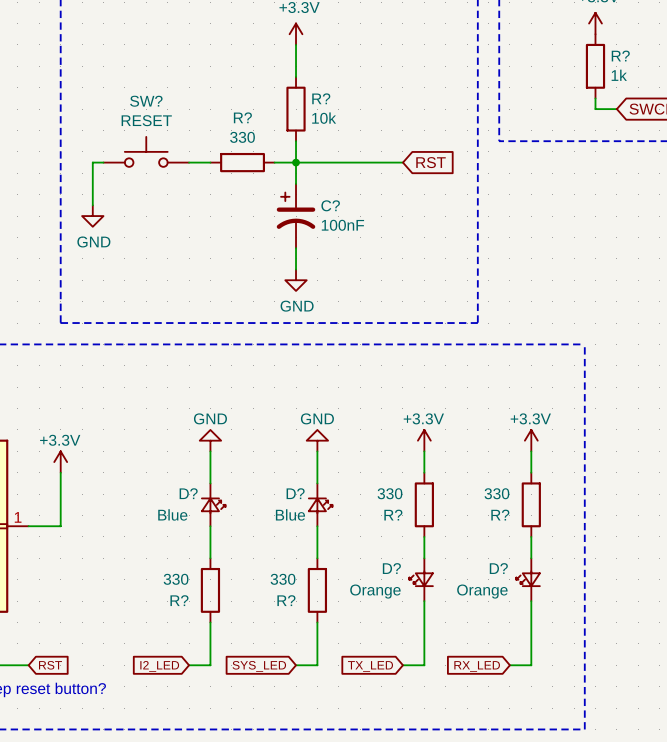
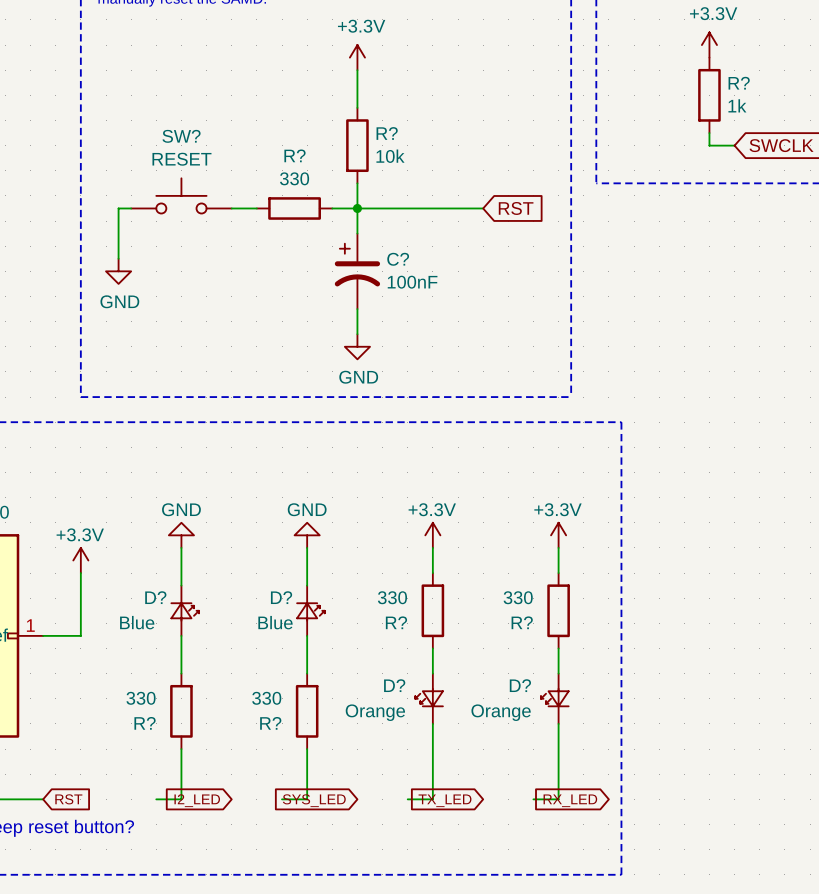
line: (520, 344) (584, 344) (584, 729) (520, 729) -> (621, 422) (621, 874)
power symbol: none -> GND (181, 535)
power symbol: GND (210, 440) -> none
power symbol: none -> GND (307, 535)
power symbol: GND (317, 440) -> none
power symbol: none -> +3.3V (432, 535)
power symbol: +3.3V (424, 440) -> none
power symbol: none -> +3.3V (558, 535)
power symbol: +3.3V (531, 440) -> none
wire: (210, 451) (210, 483) -> (181, 547) (181, 585)
wire: (317, 451) (317, 483) -> (307, 547) (307, 585)
wire: (424, 451) (424, 472) -> (432, 547) (432, 573)
wire: (531, 451) (531, 472) -> (558, 547) (558, 573)
D?: none -> Blue (185, 610)
D?: Blue (213, 504) -> none
D?: none -> Blue (310, 610)
D?: Blue (320, 504) -> none
R?: none -> 330 (432, 610)
R?: 330 (424, 504) -> none
R?: none -> 330 (558, 610)
R?: 330 (531, 504) -> none
wire: (210, 526) (210, 558) -> (181, 635) (181, 673)
wire: (317, 526) (317, 558) -> (307, 635) (307, 673)
wire: (424, 536) (424, 558) -> (432, 648) (432, 673)
wire: (531, 536) (531, 558) -> (558, 648) (558, 673)
D?: none -> Orange (429, 698)
D?: Orange (421, 579) -> none
D?: none -> Orange (554, 698)
D?: Orange (528, 579) -> none
R?: none -> 330 (181, 711)
R?: 330 (210, 590) -> none
R?: none -> 330 (307, 711)
R?: 330 (317, 590) -> none
wire: (424, 601) (424, 665) (402, 665) -> (432, 723) (432, 799) (407, 799)
wire: (531, 601) (531, 665) (509, 665) -> (558, 723) (558, 799) (533, 799)
wire: (210, 622) (210, 665) (189, 665) -> (181, 749) (181, 799) (156, 799)
wire: (317, 622) (317, 665) (296, 665) -> (307, 749) (307, 799) (282, 799)

